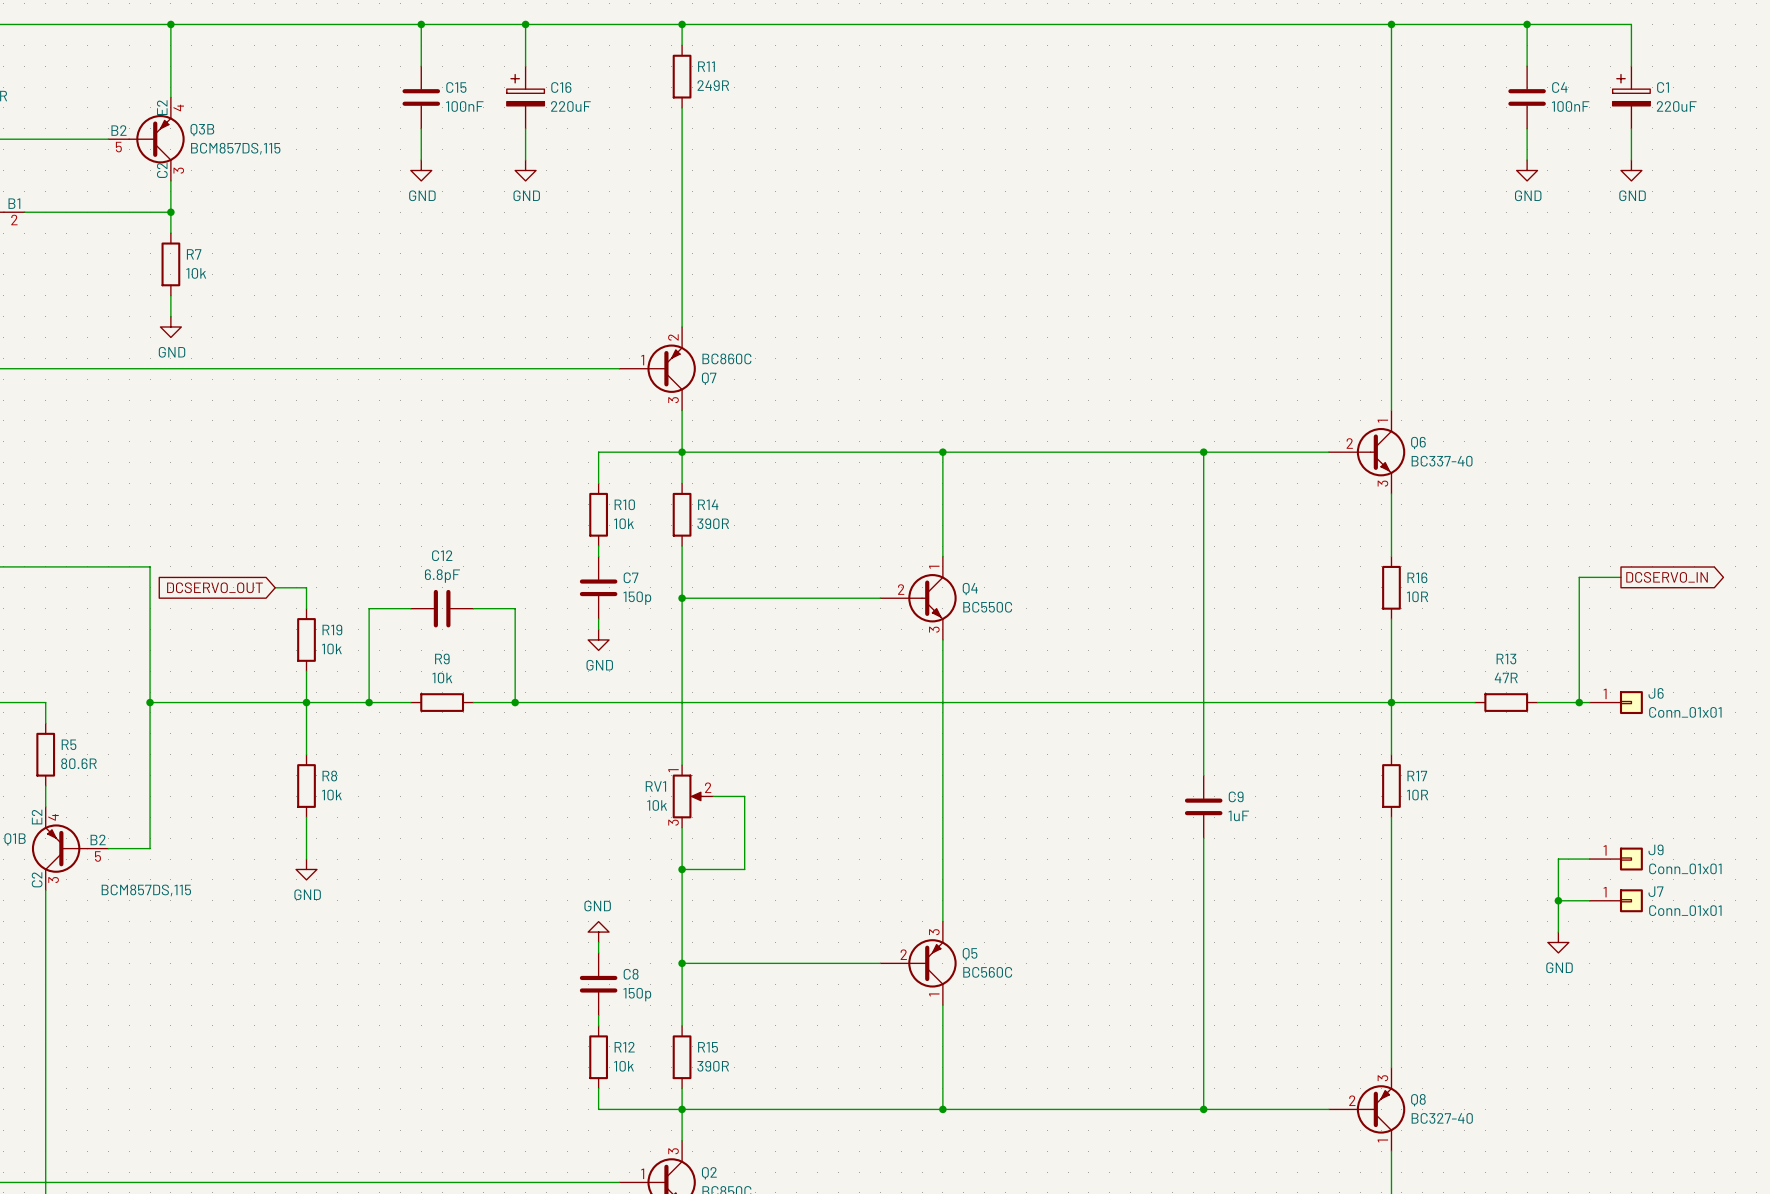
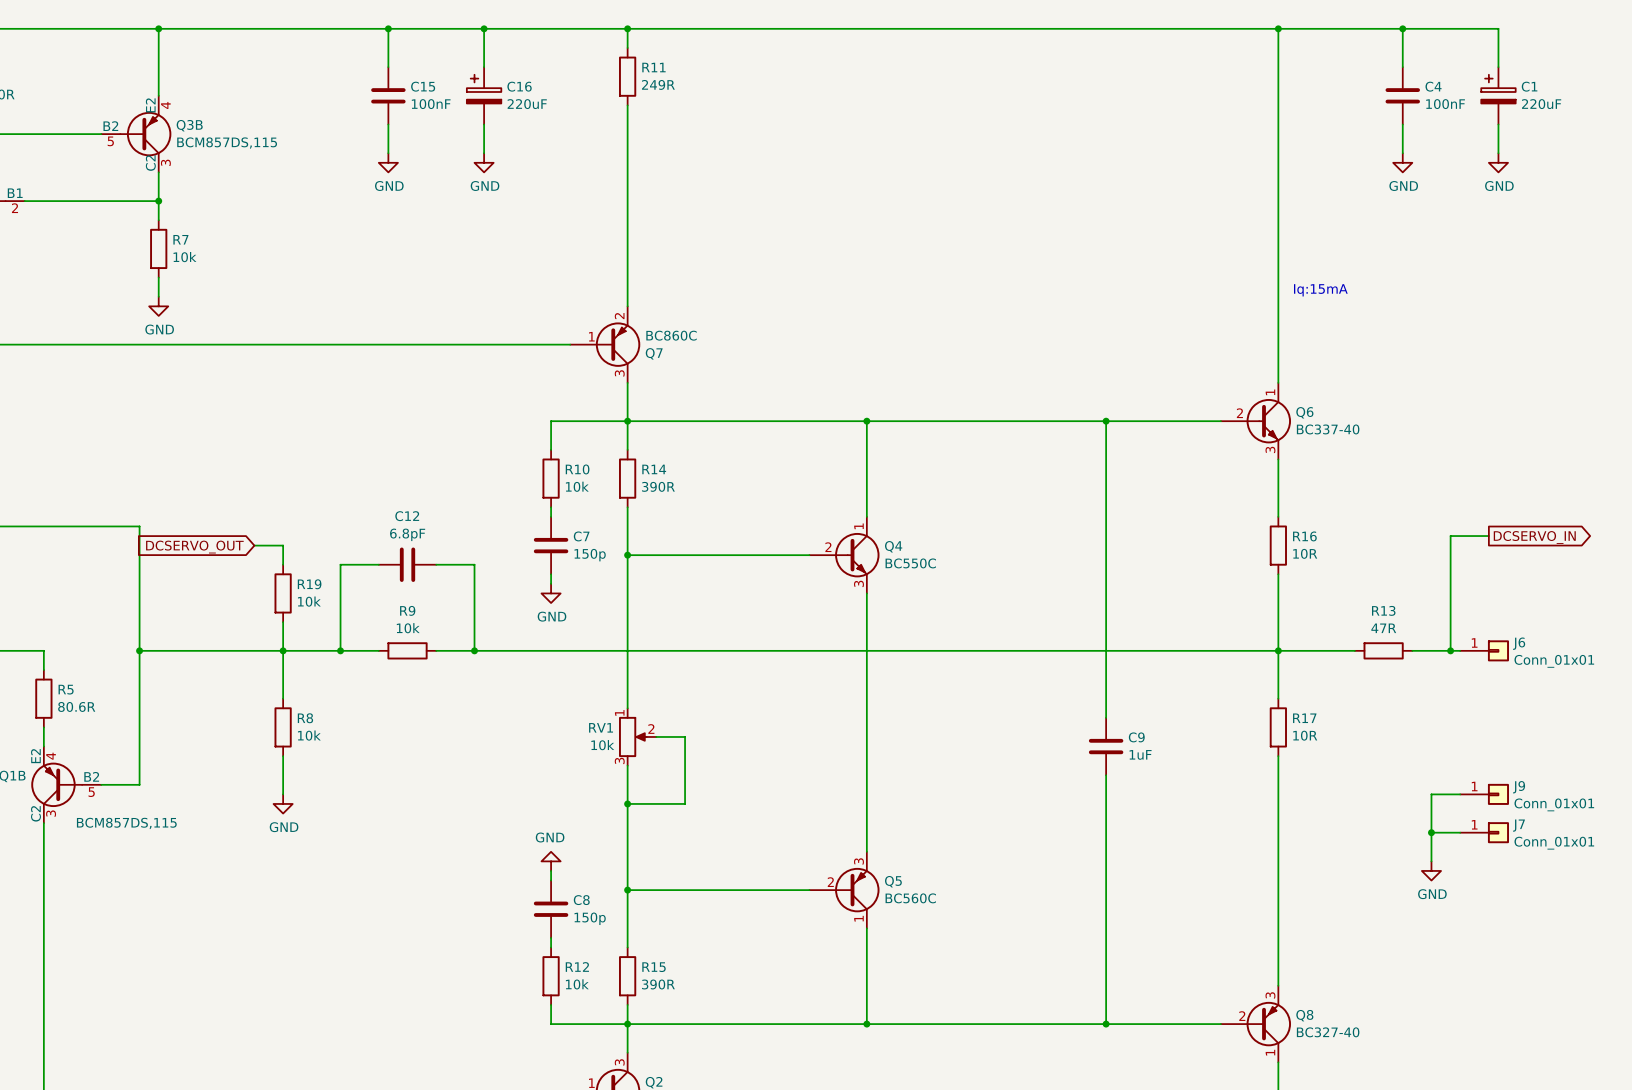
text: none -> Iq:15mA (1320, 290)

